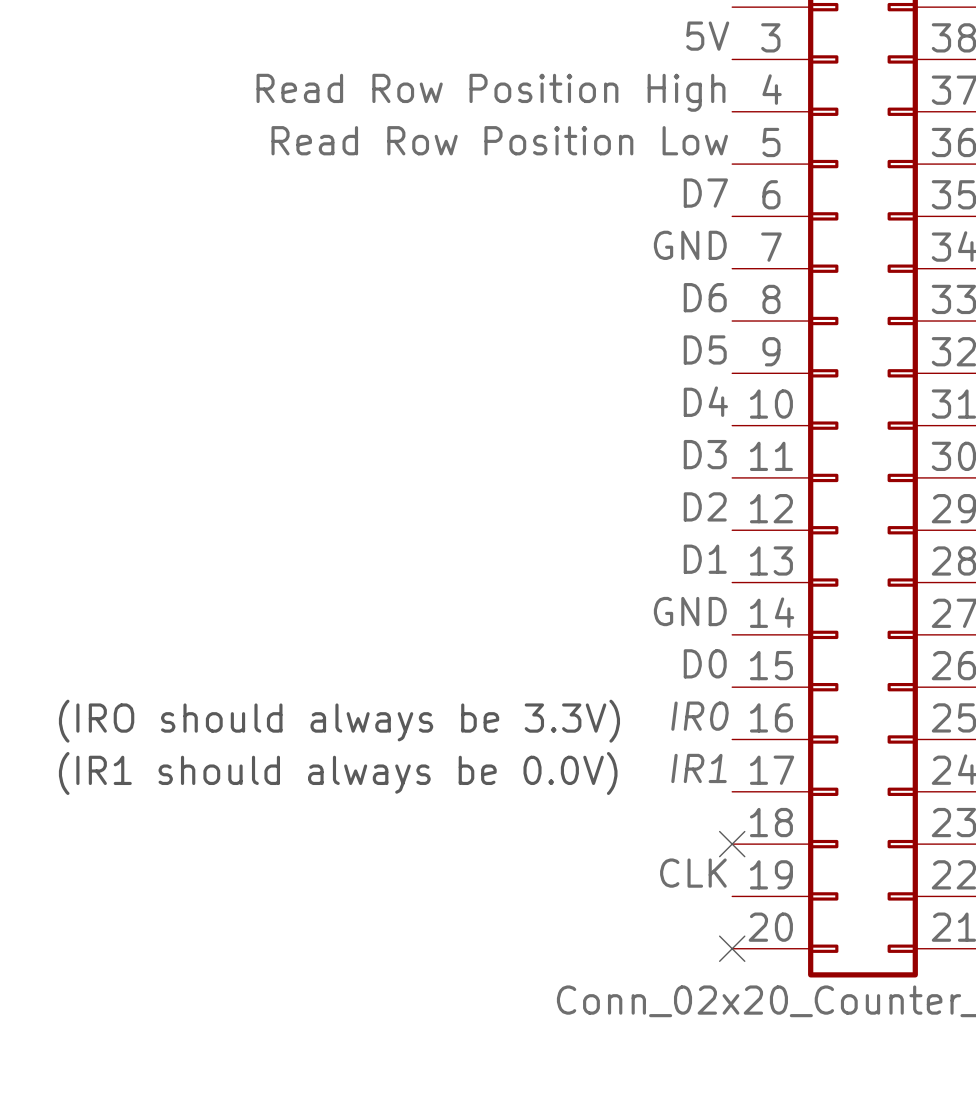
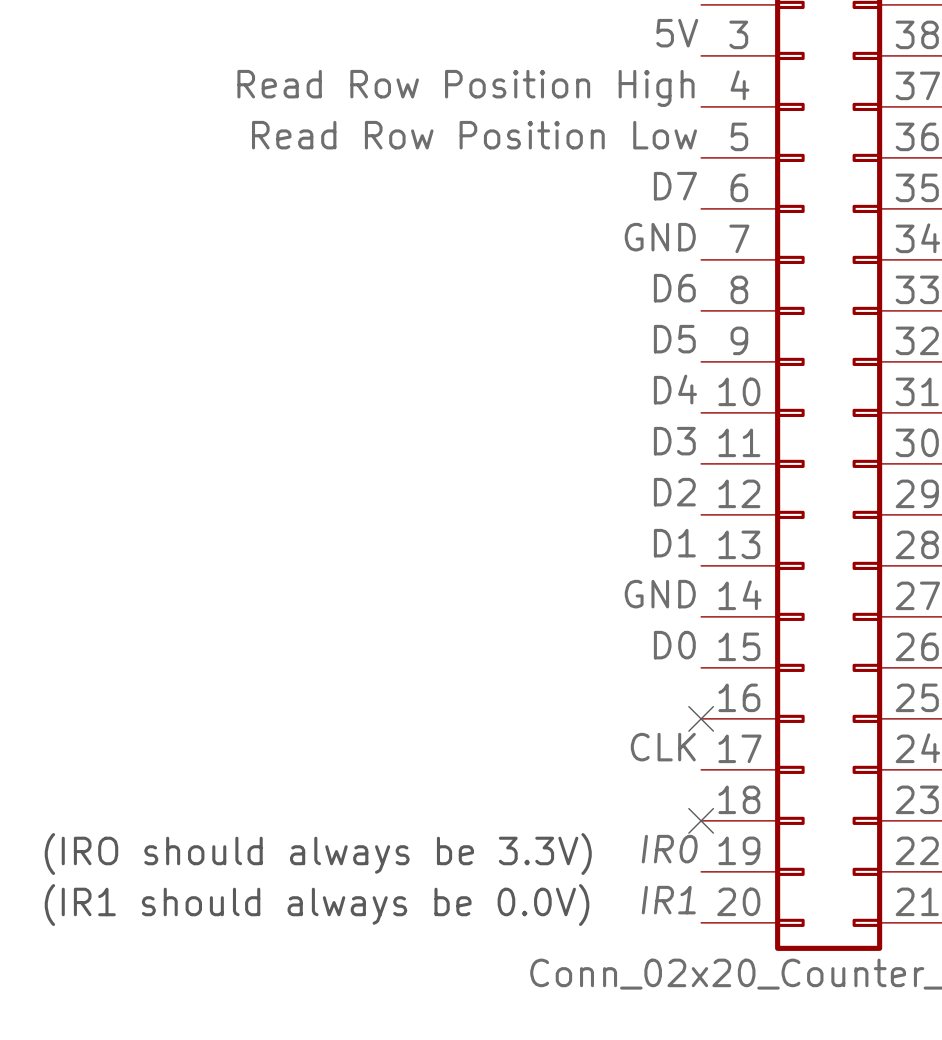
label: IR0 (700, 716) -> none
text position: (IRO should always be 3.3V) (339, 721) -> (IRO should always be 3.3V) (318, 854)
no-connect mark: none -> (701, 718)
label: IR1 (699, 768) -> CLK (663, 747)
text position: (IR1 should always be 0.0V) (338, 773) -> (IR1 should always be 0.0V) (317, 905)
label: CLK (693, 873) -> IR0 (669, 849)
label: none -> IR1 (668, 900)
no-connect mark: (732, 948) -> none

